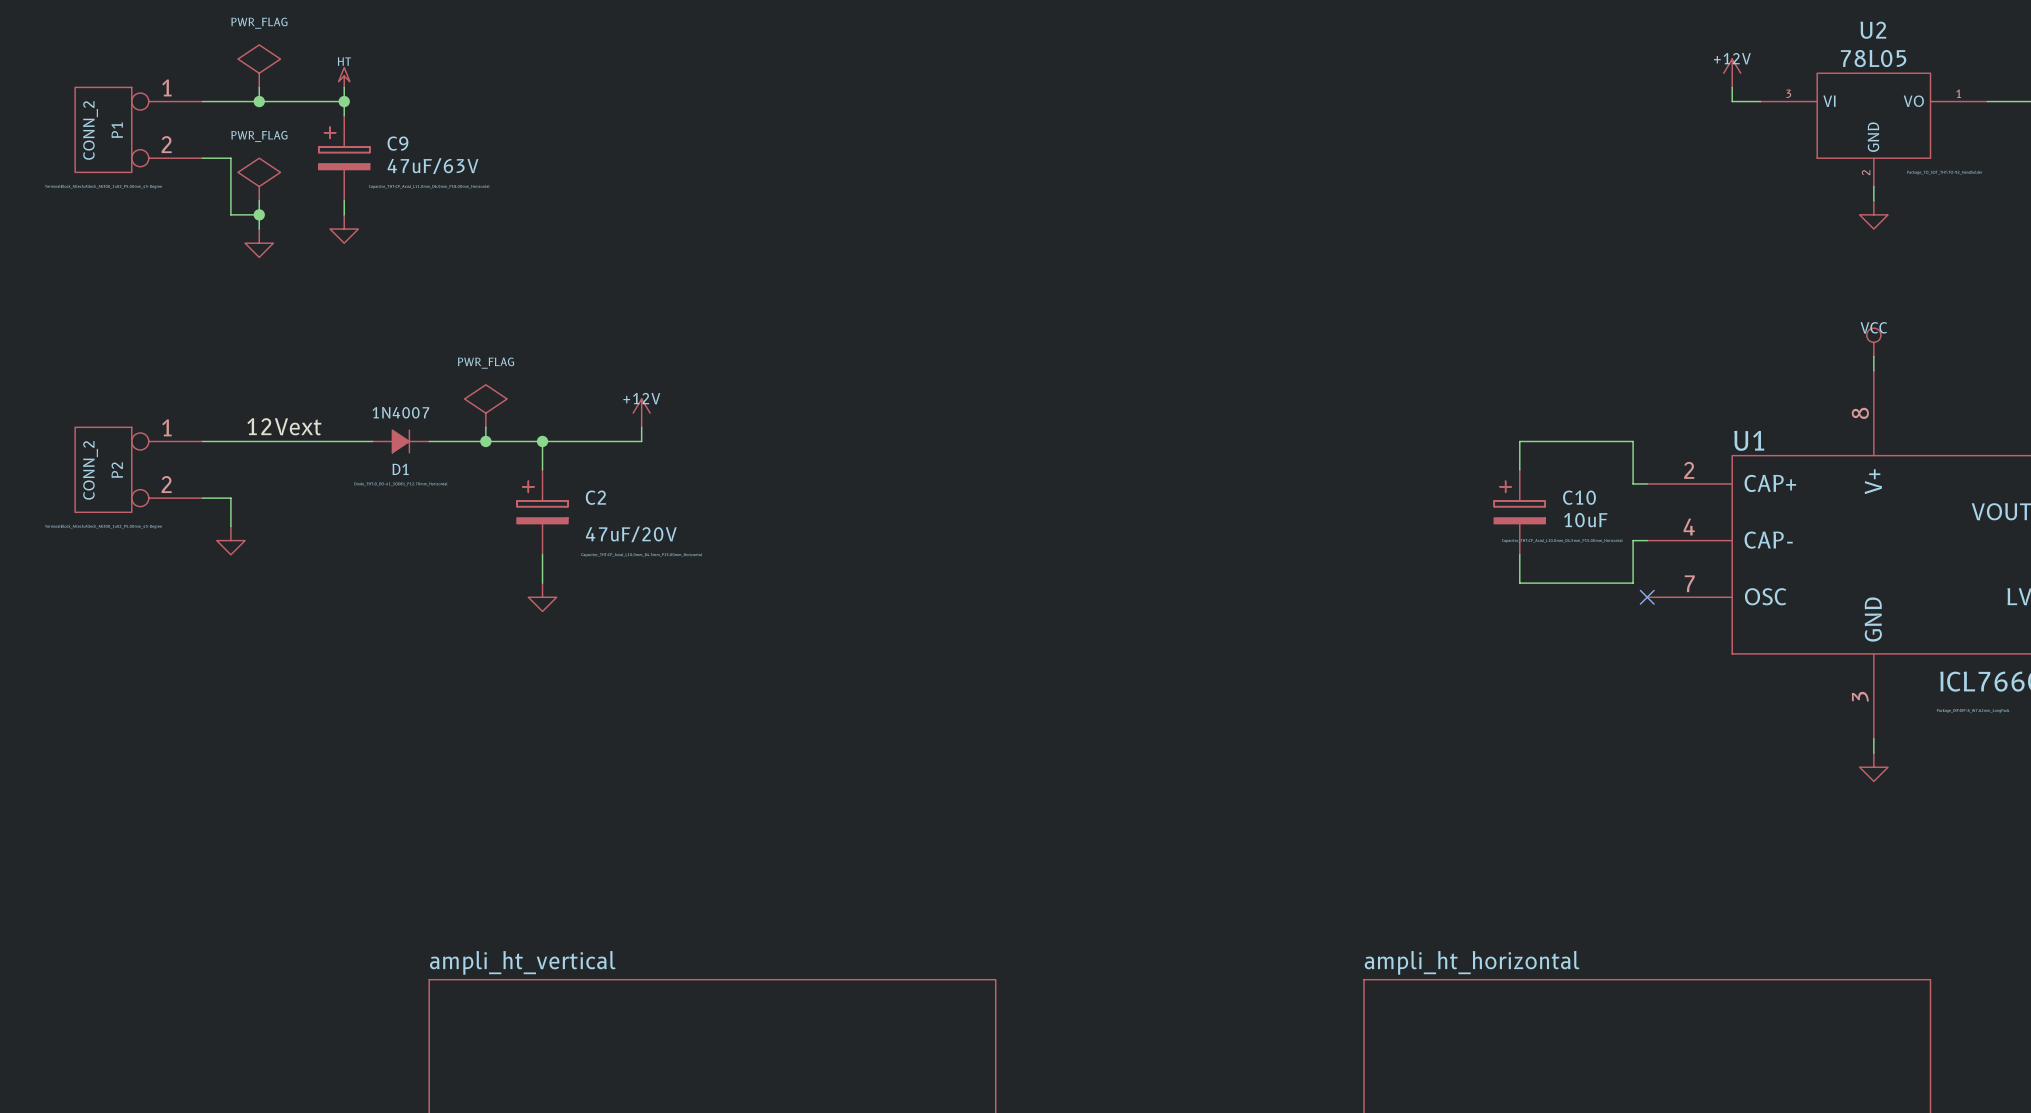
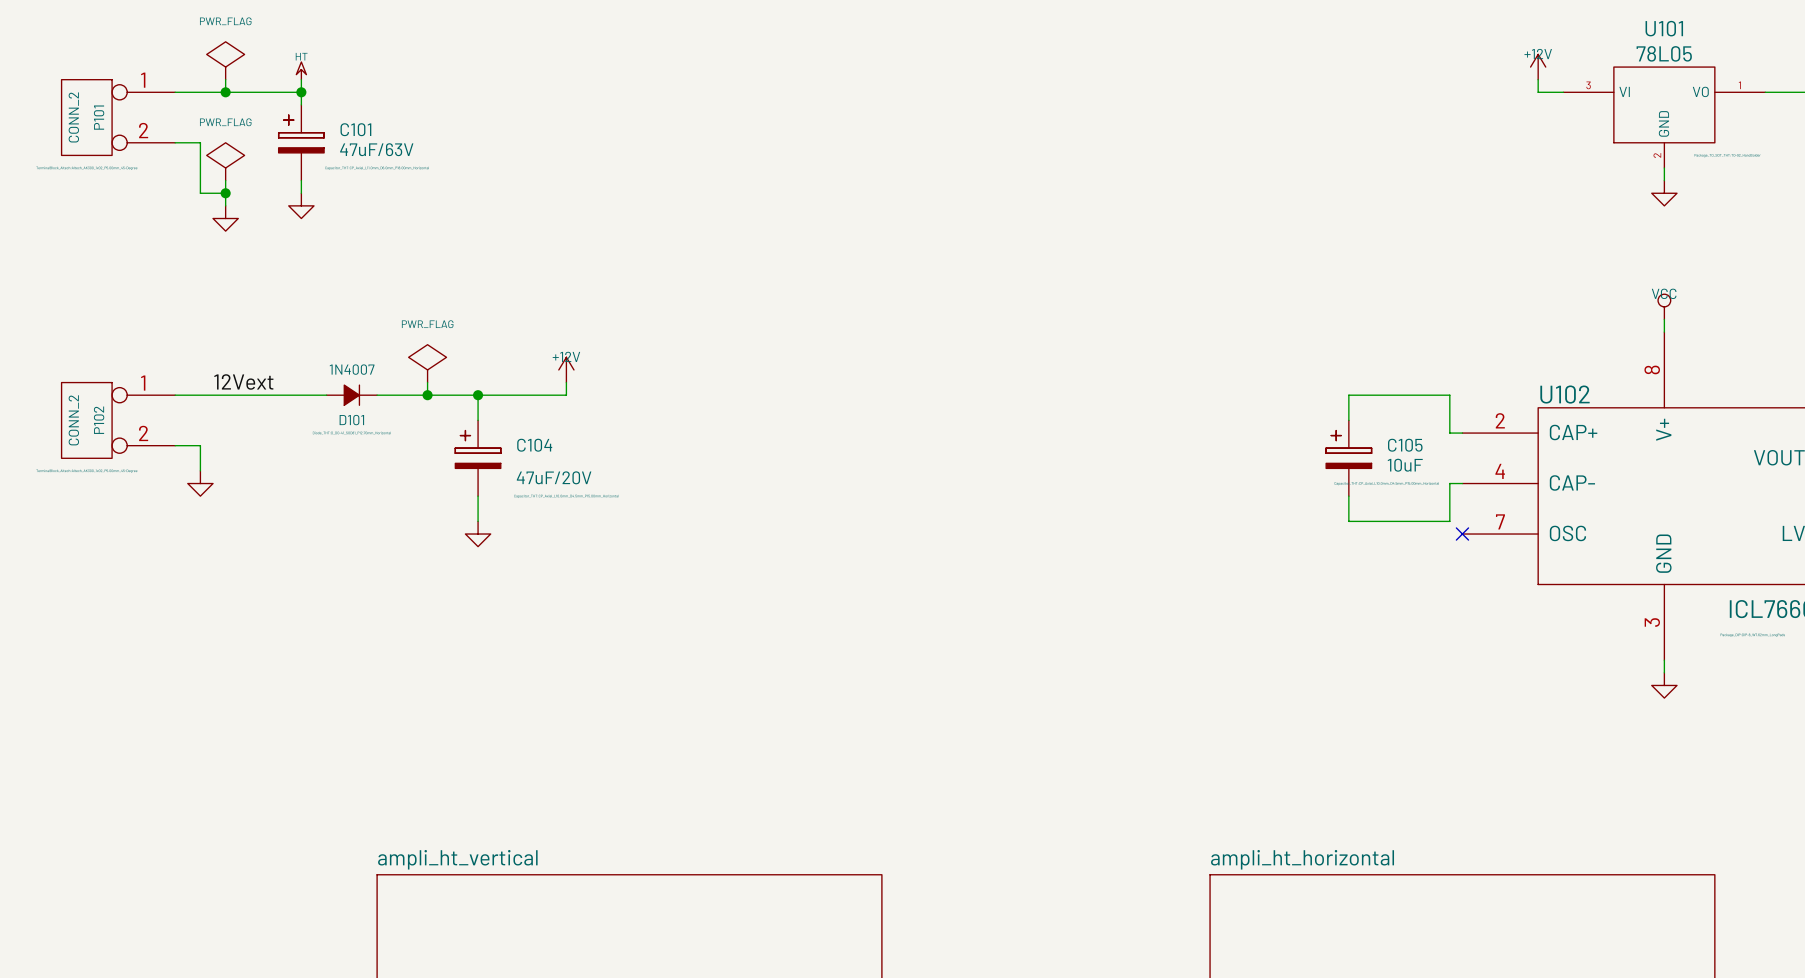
U2 name: U2 (1873, 30) -> U101 (1664, 28)
P1 name: P1 (117, 130) -> P101 (99, 117)
C9 name: C9 (397, 143) -> C101 (355, 129)
U1 name: U1 (1749, 440) -> U102 (1565, 394)
D1 name: D1 (400, 469) -> D101 (351, 420)
P2 name: P2 (117, 470) -> P102 (99, 420)
C2 name: C2 (595, 497) -> C104 (534, 445)
C10 name: C10 (1579, 497) -> C105 (1405, 445)

